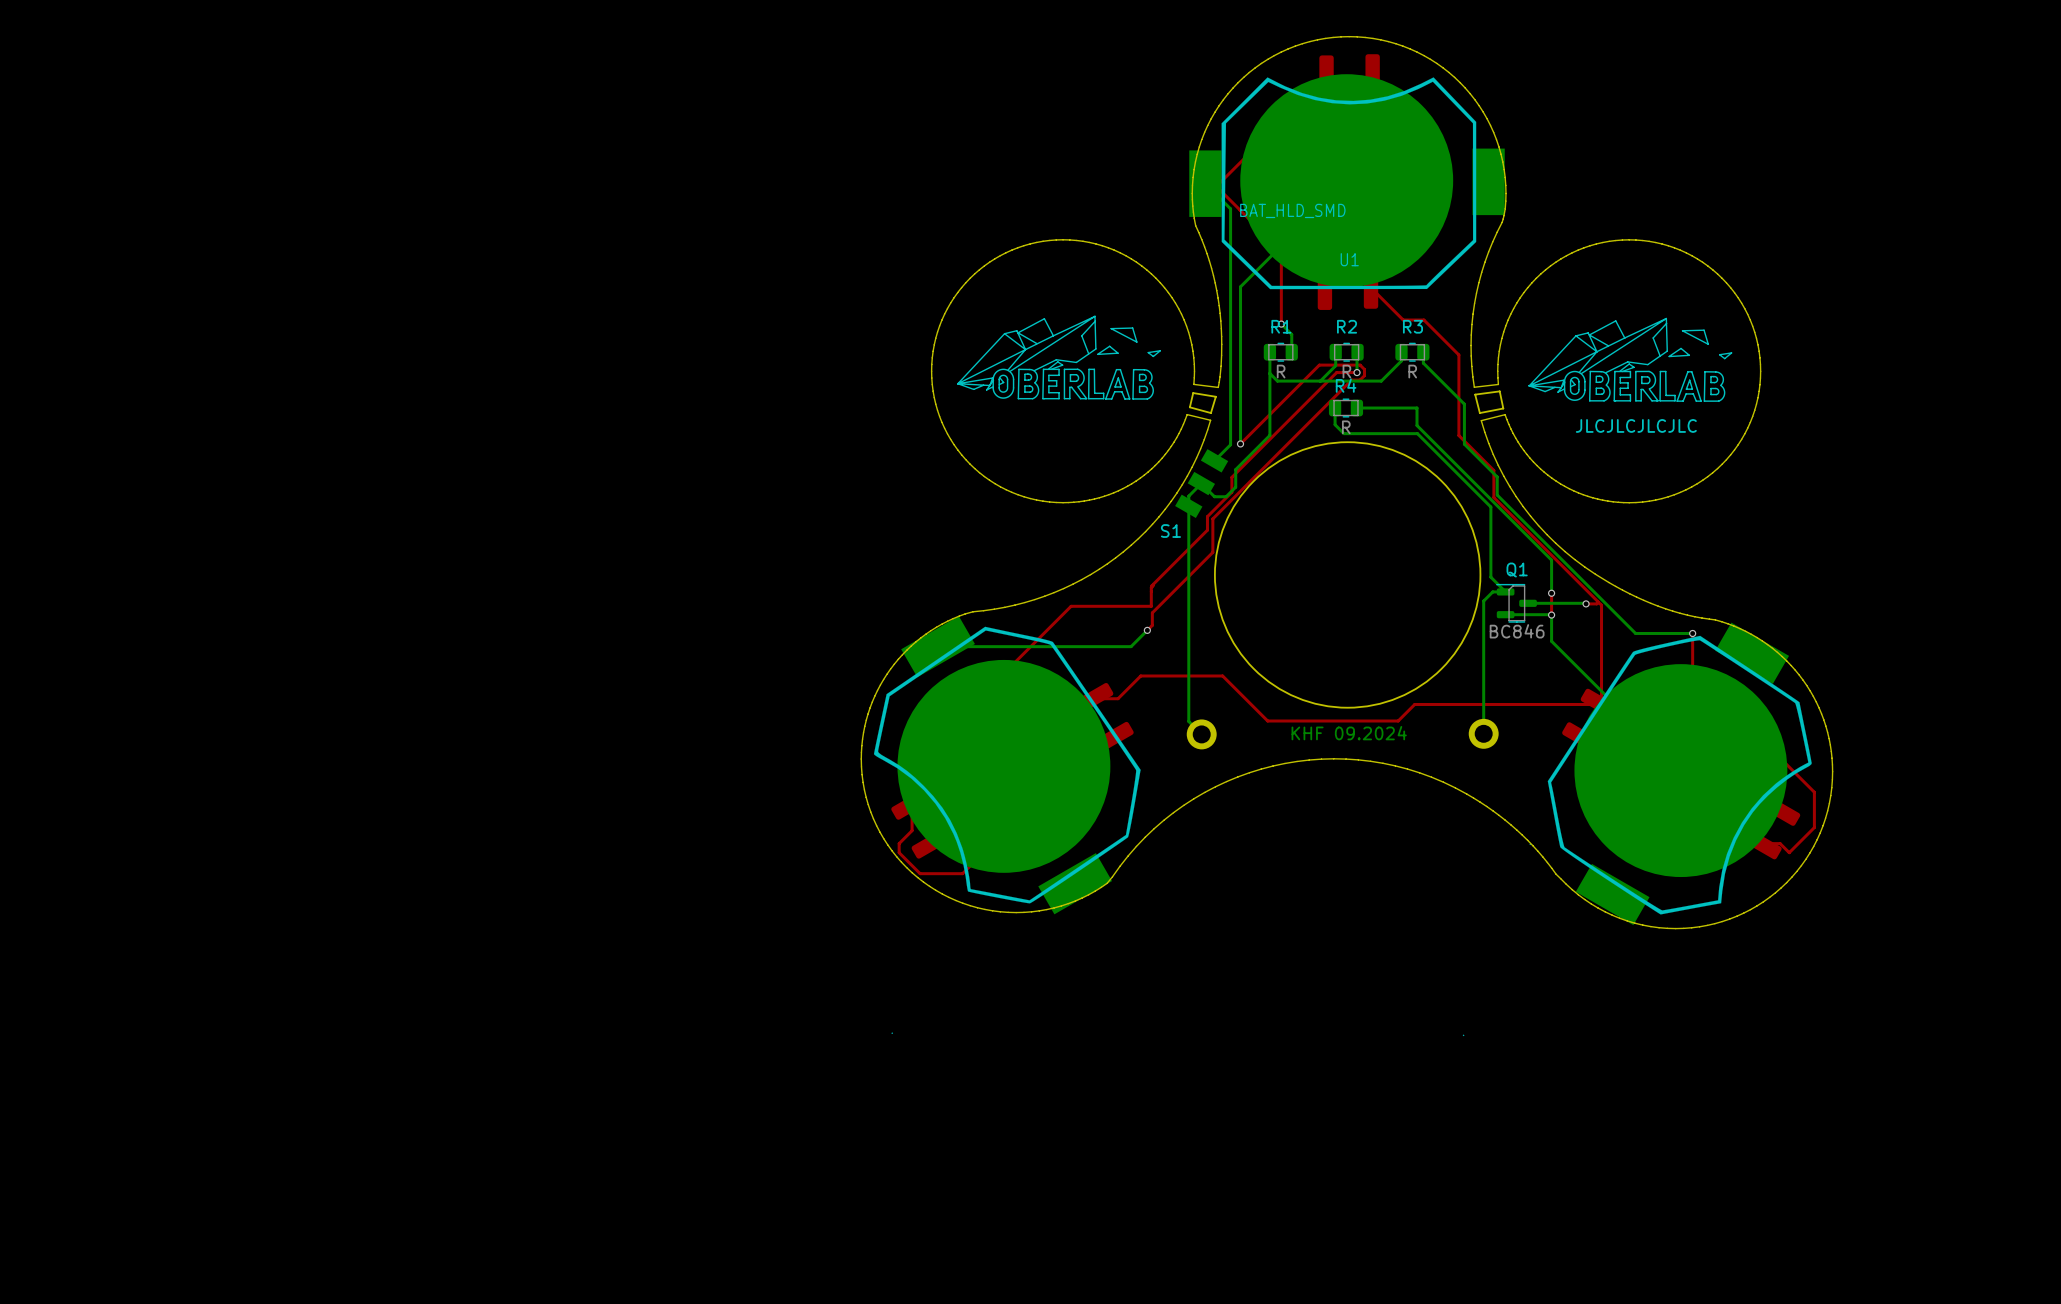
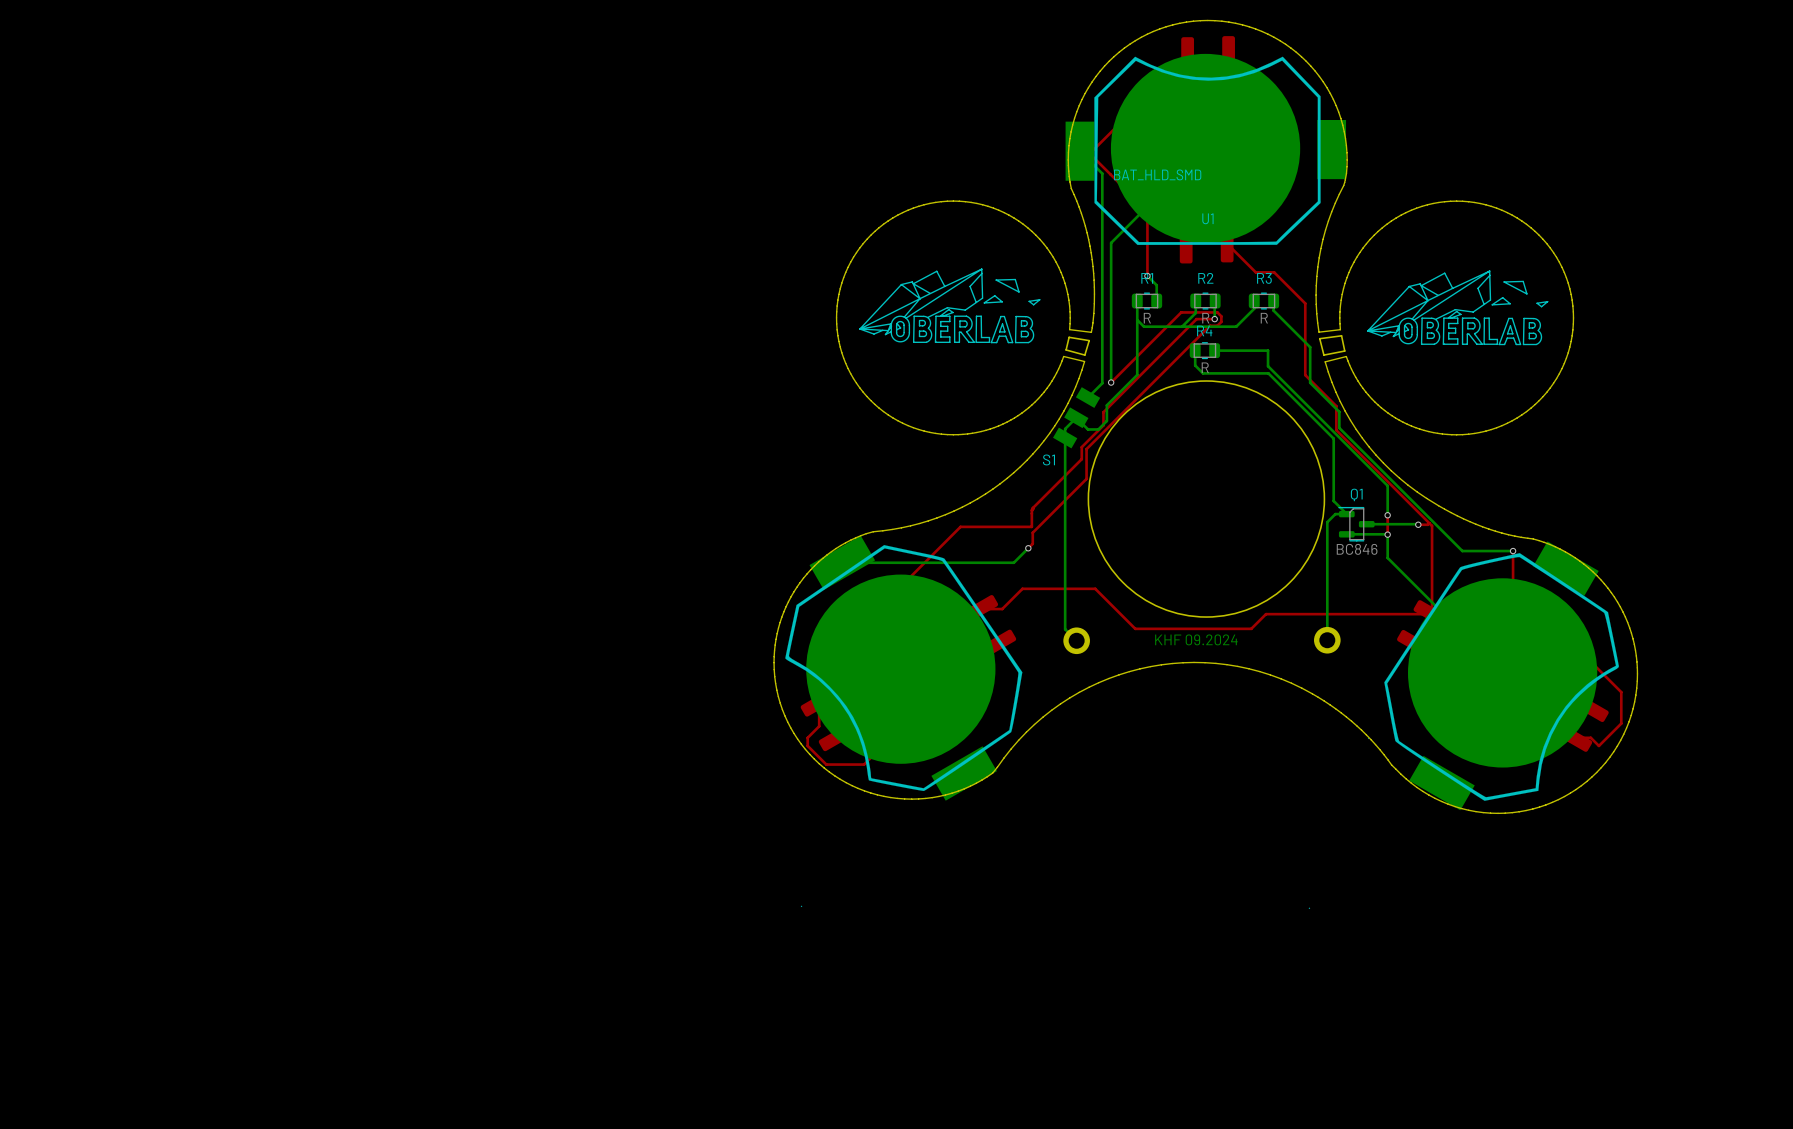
text: JLCJLCJLCJLC (1636, 425) -> none

